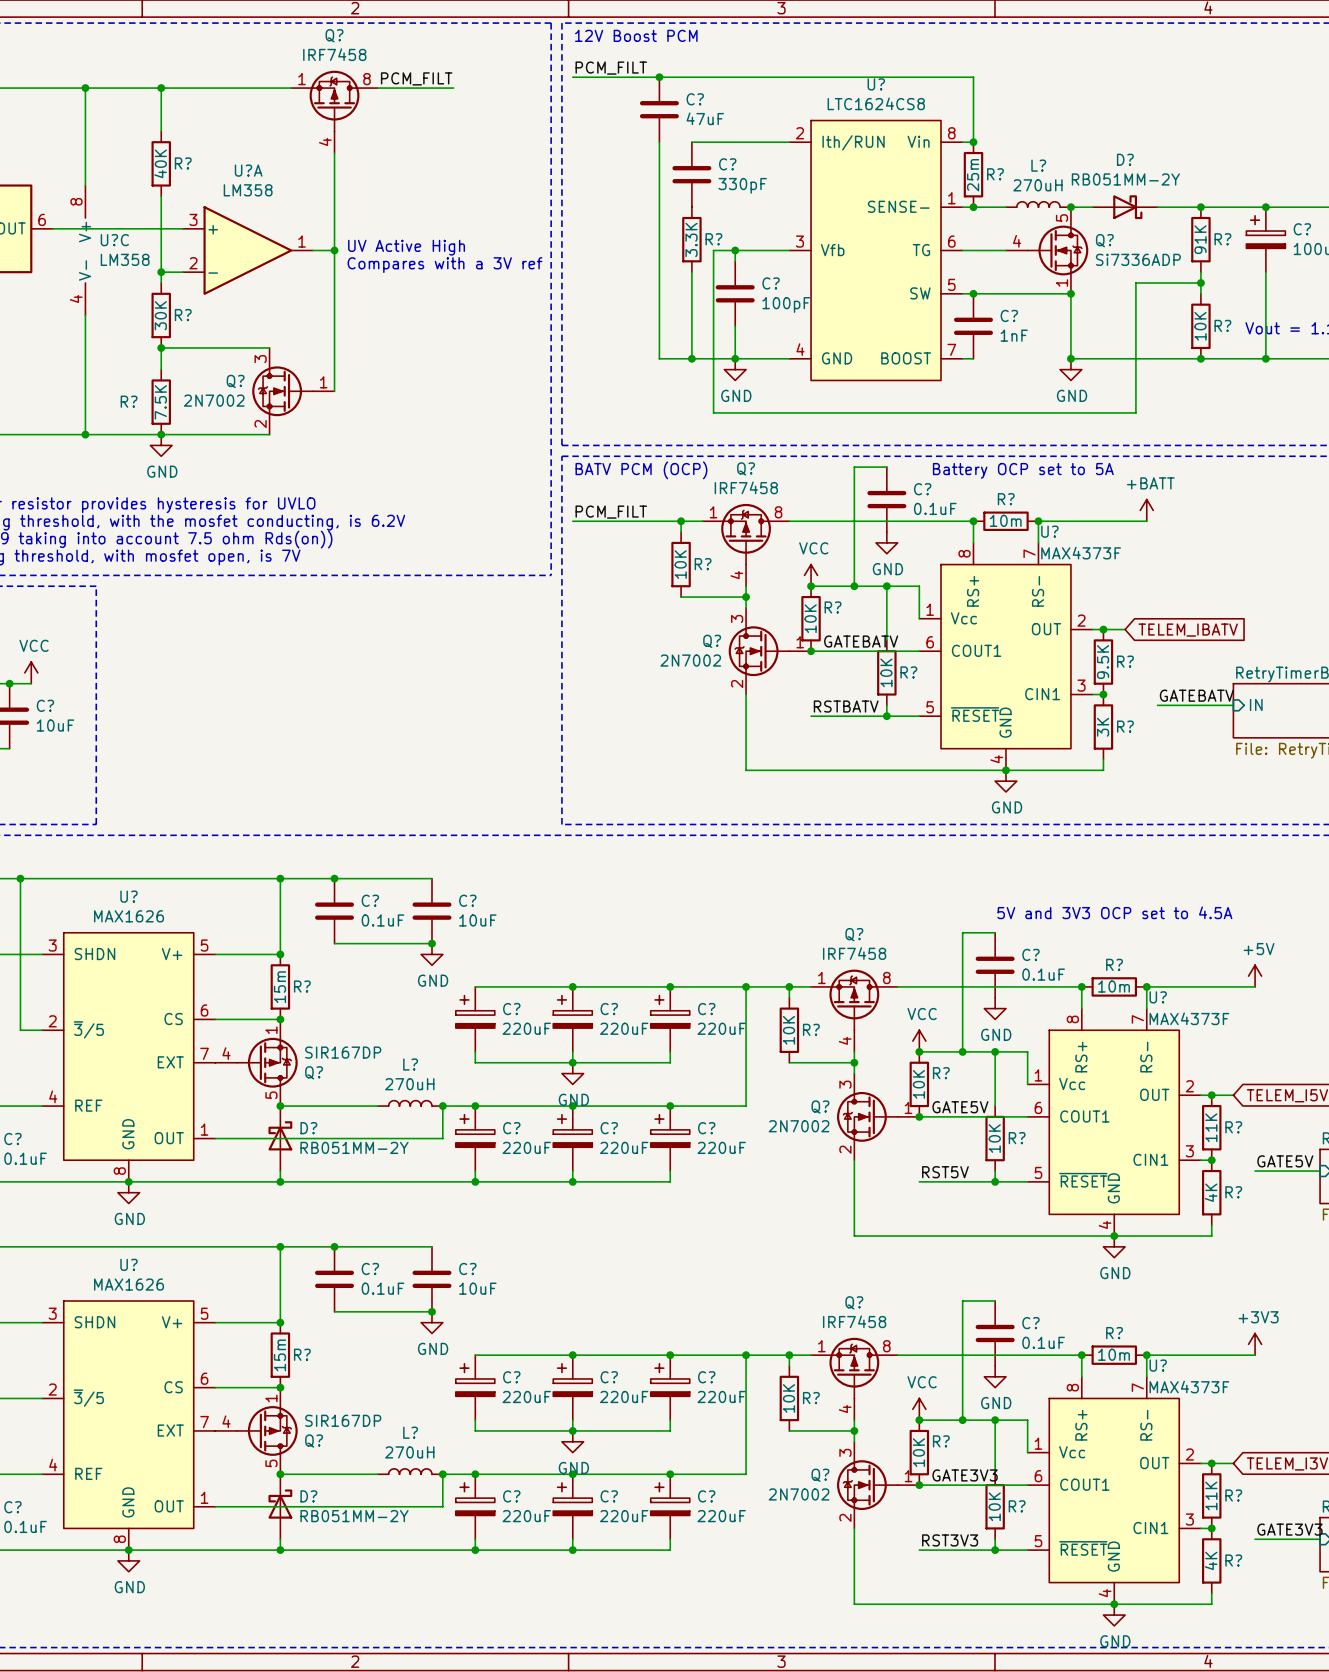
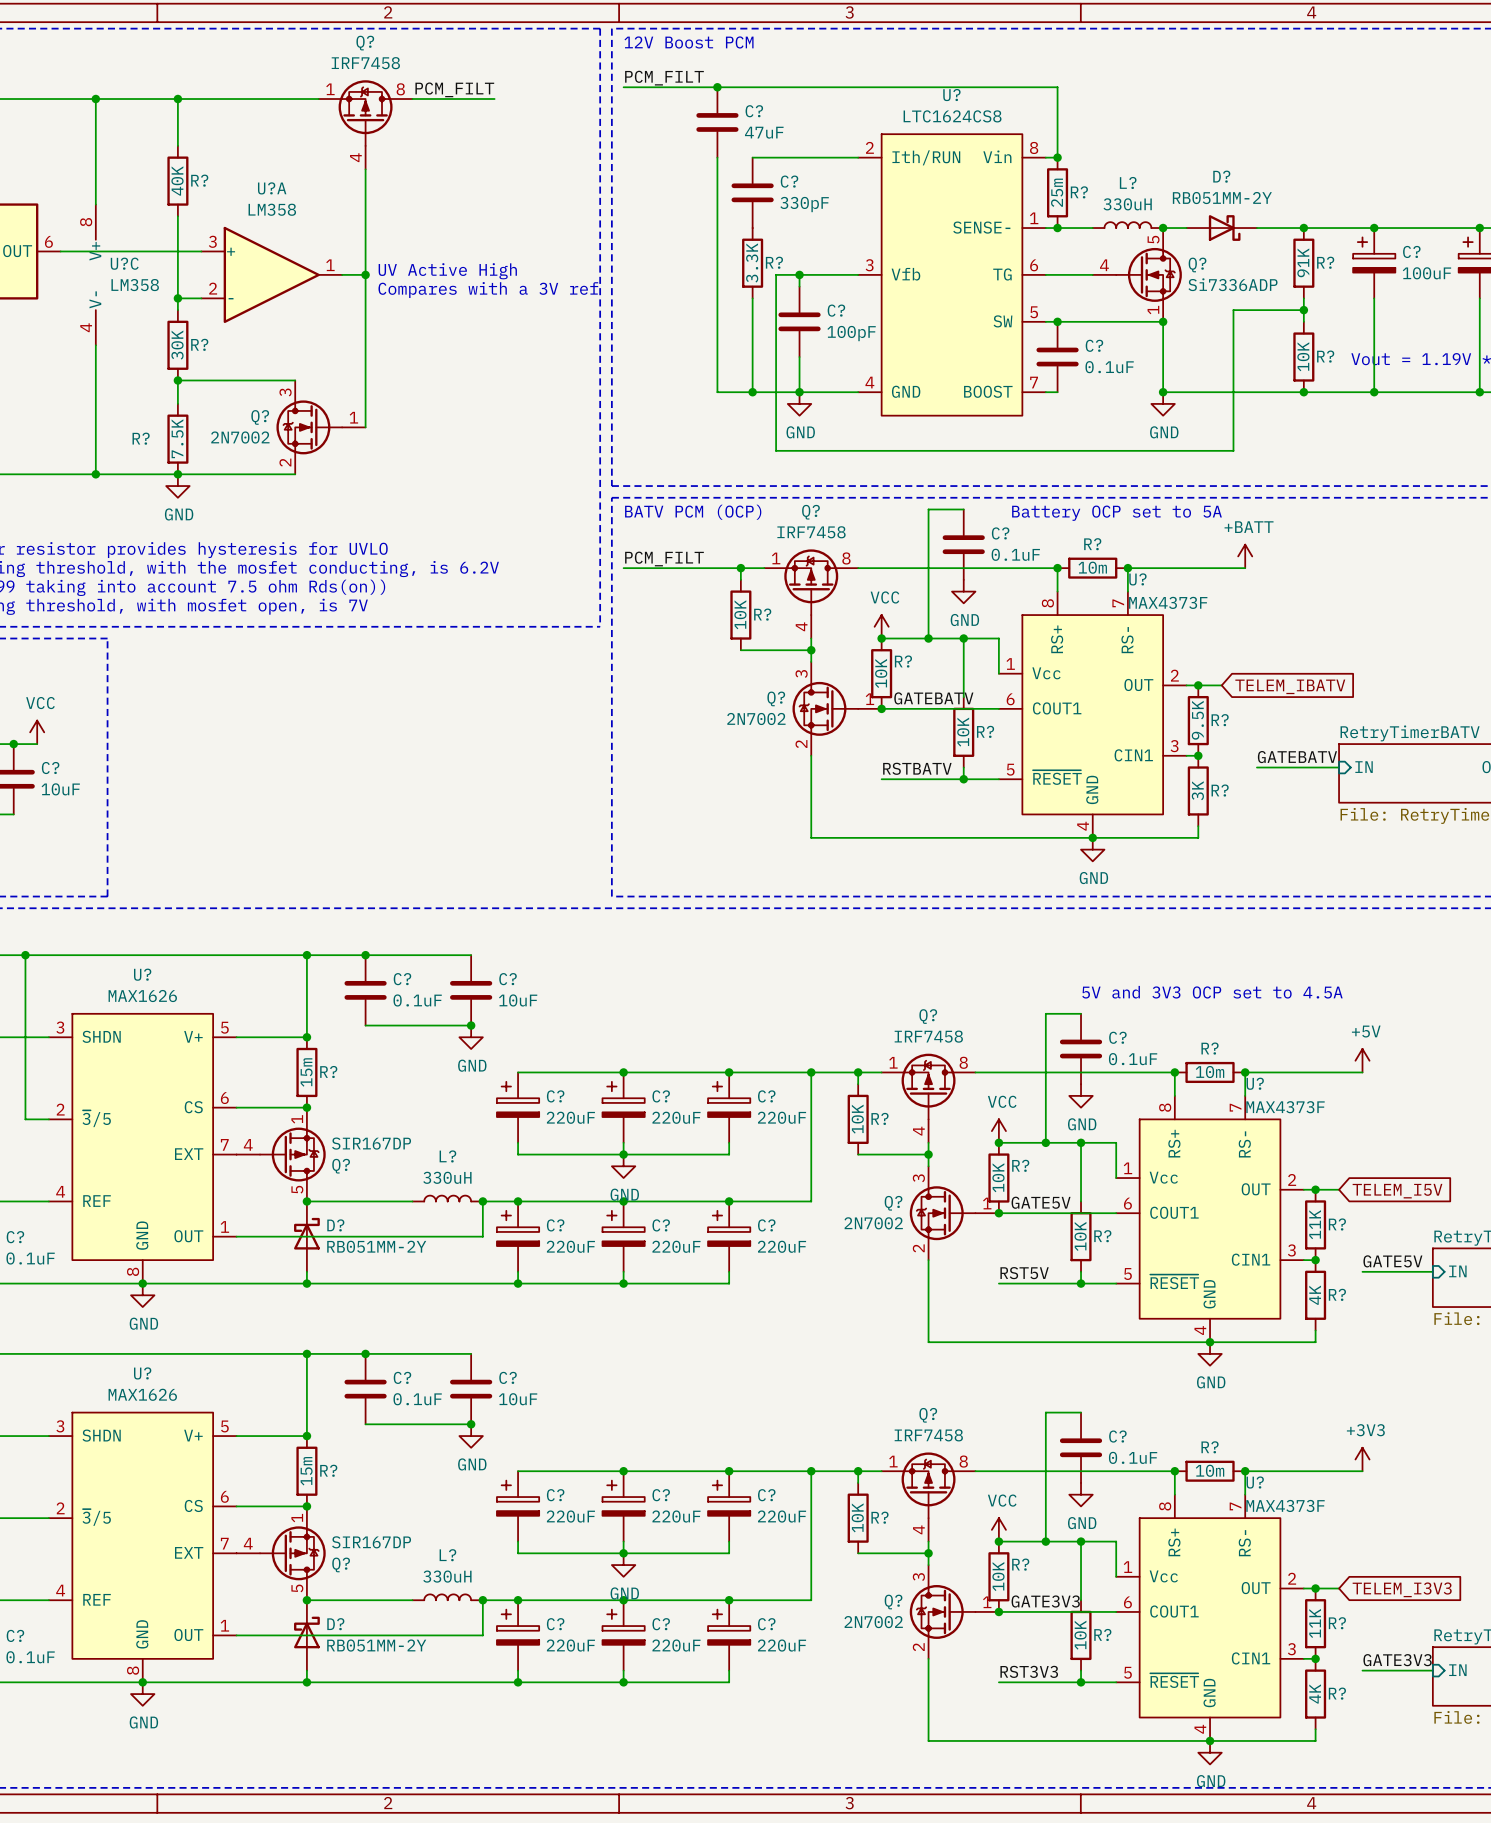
L? value: 270uH (1037, 185) -> 330uH (1127, 204)
C? value: 1nF (1014, 335) -> 0.1uF (1109, 367)
L? value: 270uH (409, 1084) -> 330uH (447, 1177)
L? value: 270uH (409, 1452) -> 330uH (447, 1576)

